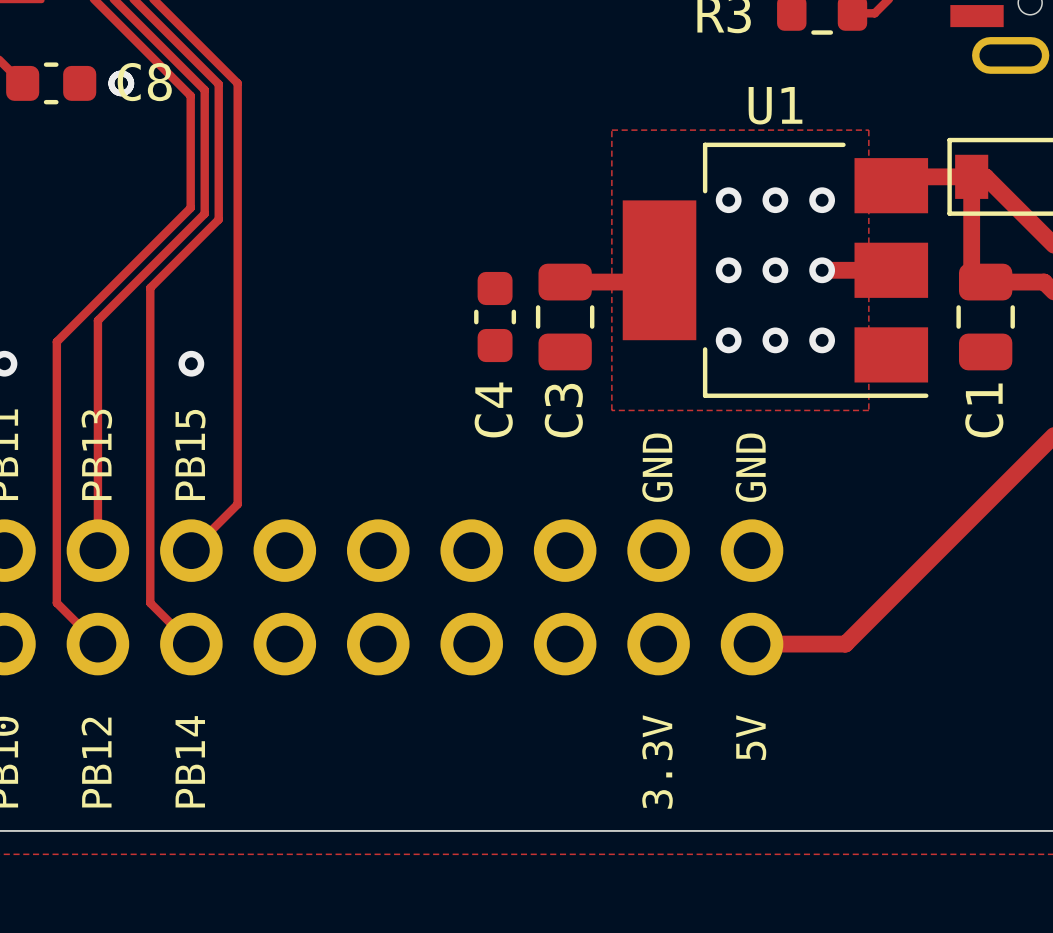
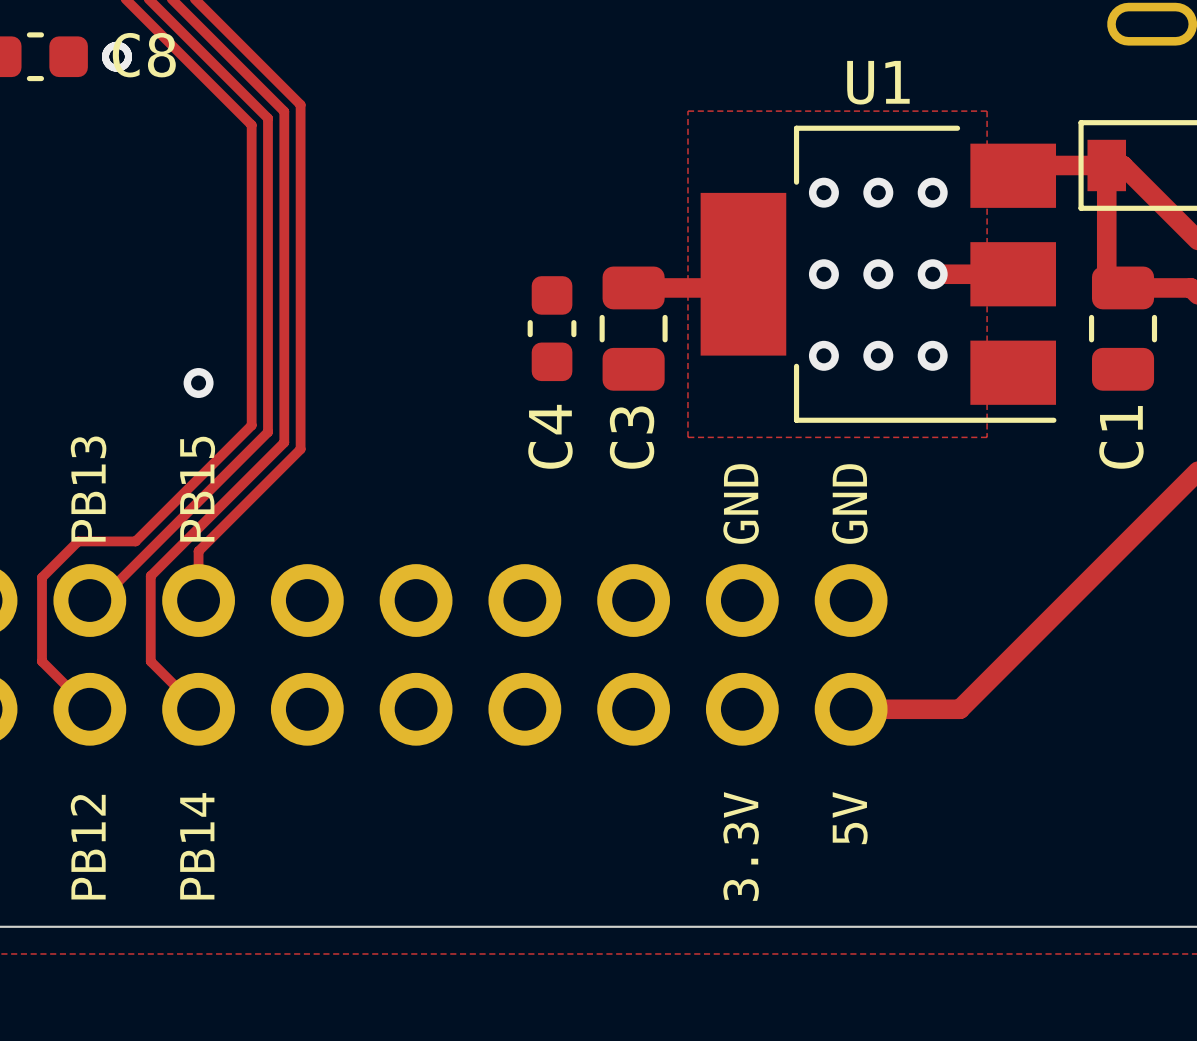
track: (237, 83) (237, 504) (191, 550) -> (252, 56) (300, 104) (300, 449) (198, 551) (198, 600)
track: (218, 84) (218, 219) (150, 288) (150, 529) -> (230, 57) (284, 111) (284, 442) (150, 576)
track: (204, 90) (204, 213) (97, 320) (97, 550) -> (214, 64) (267, 118) (267, 432) (99, 600) (89, 600)
track: (190, 95) (190, 207) (56, 341) (56, 530) -> (197, 71) (251, 125) (251, 425) (135, 541) (78, 541) (42, 577)

